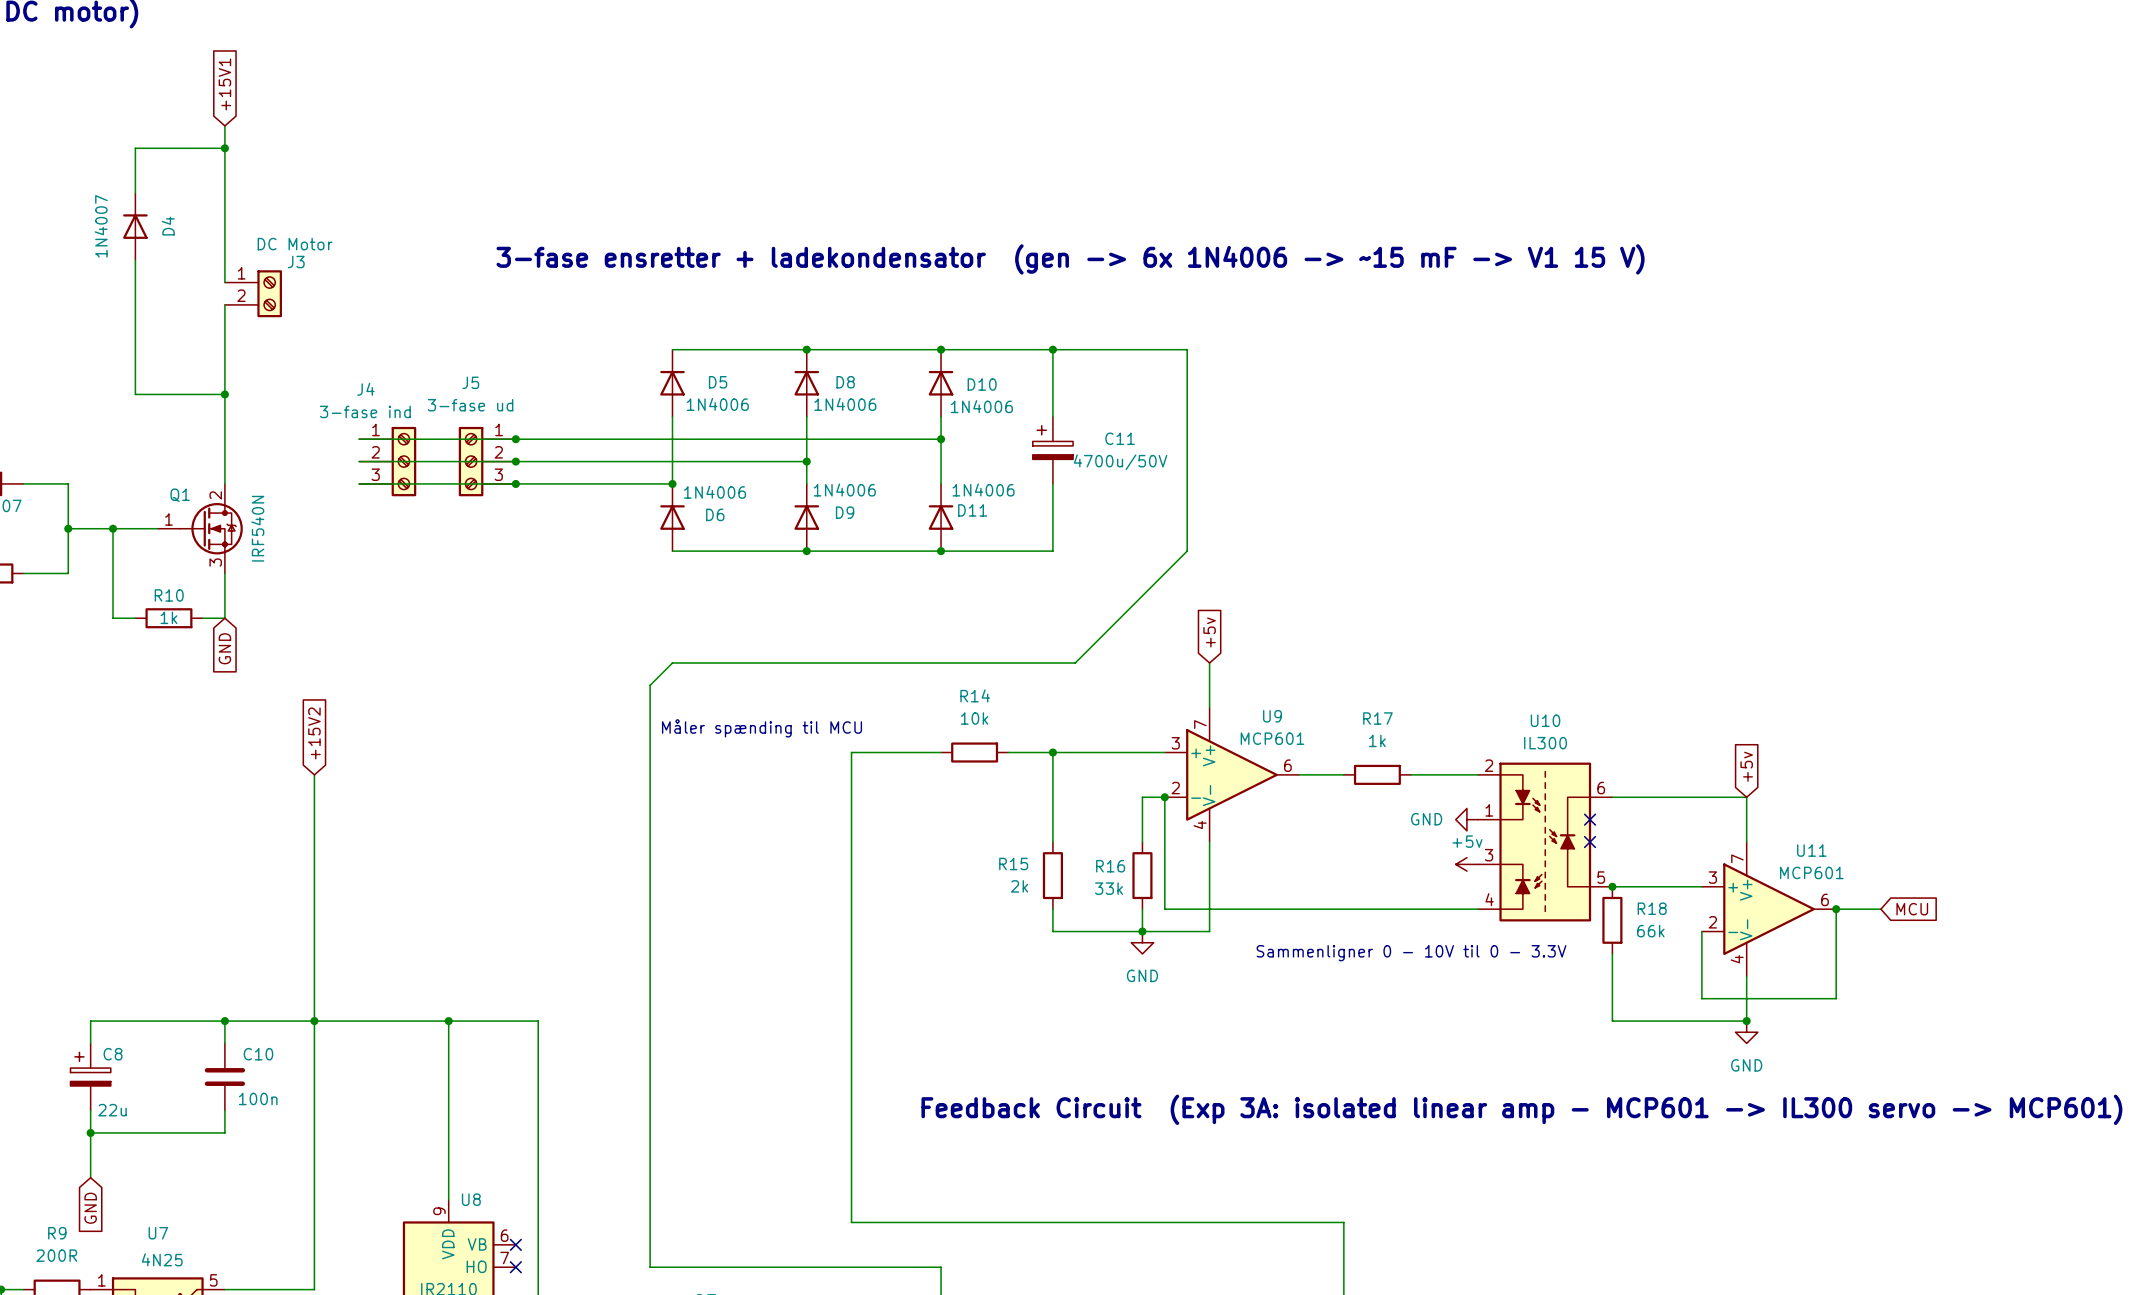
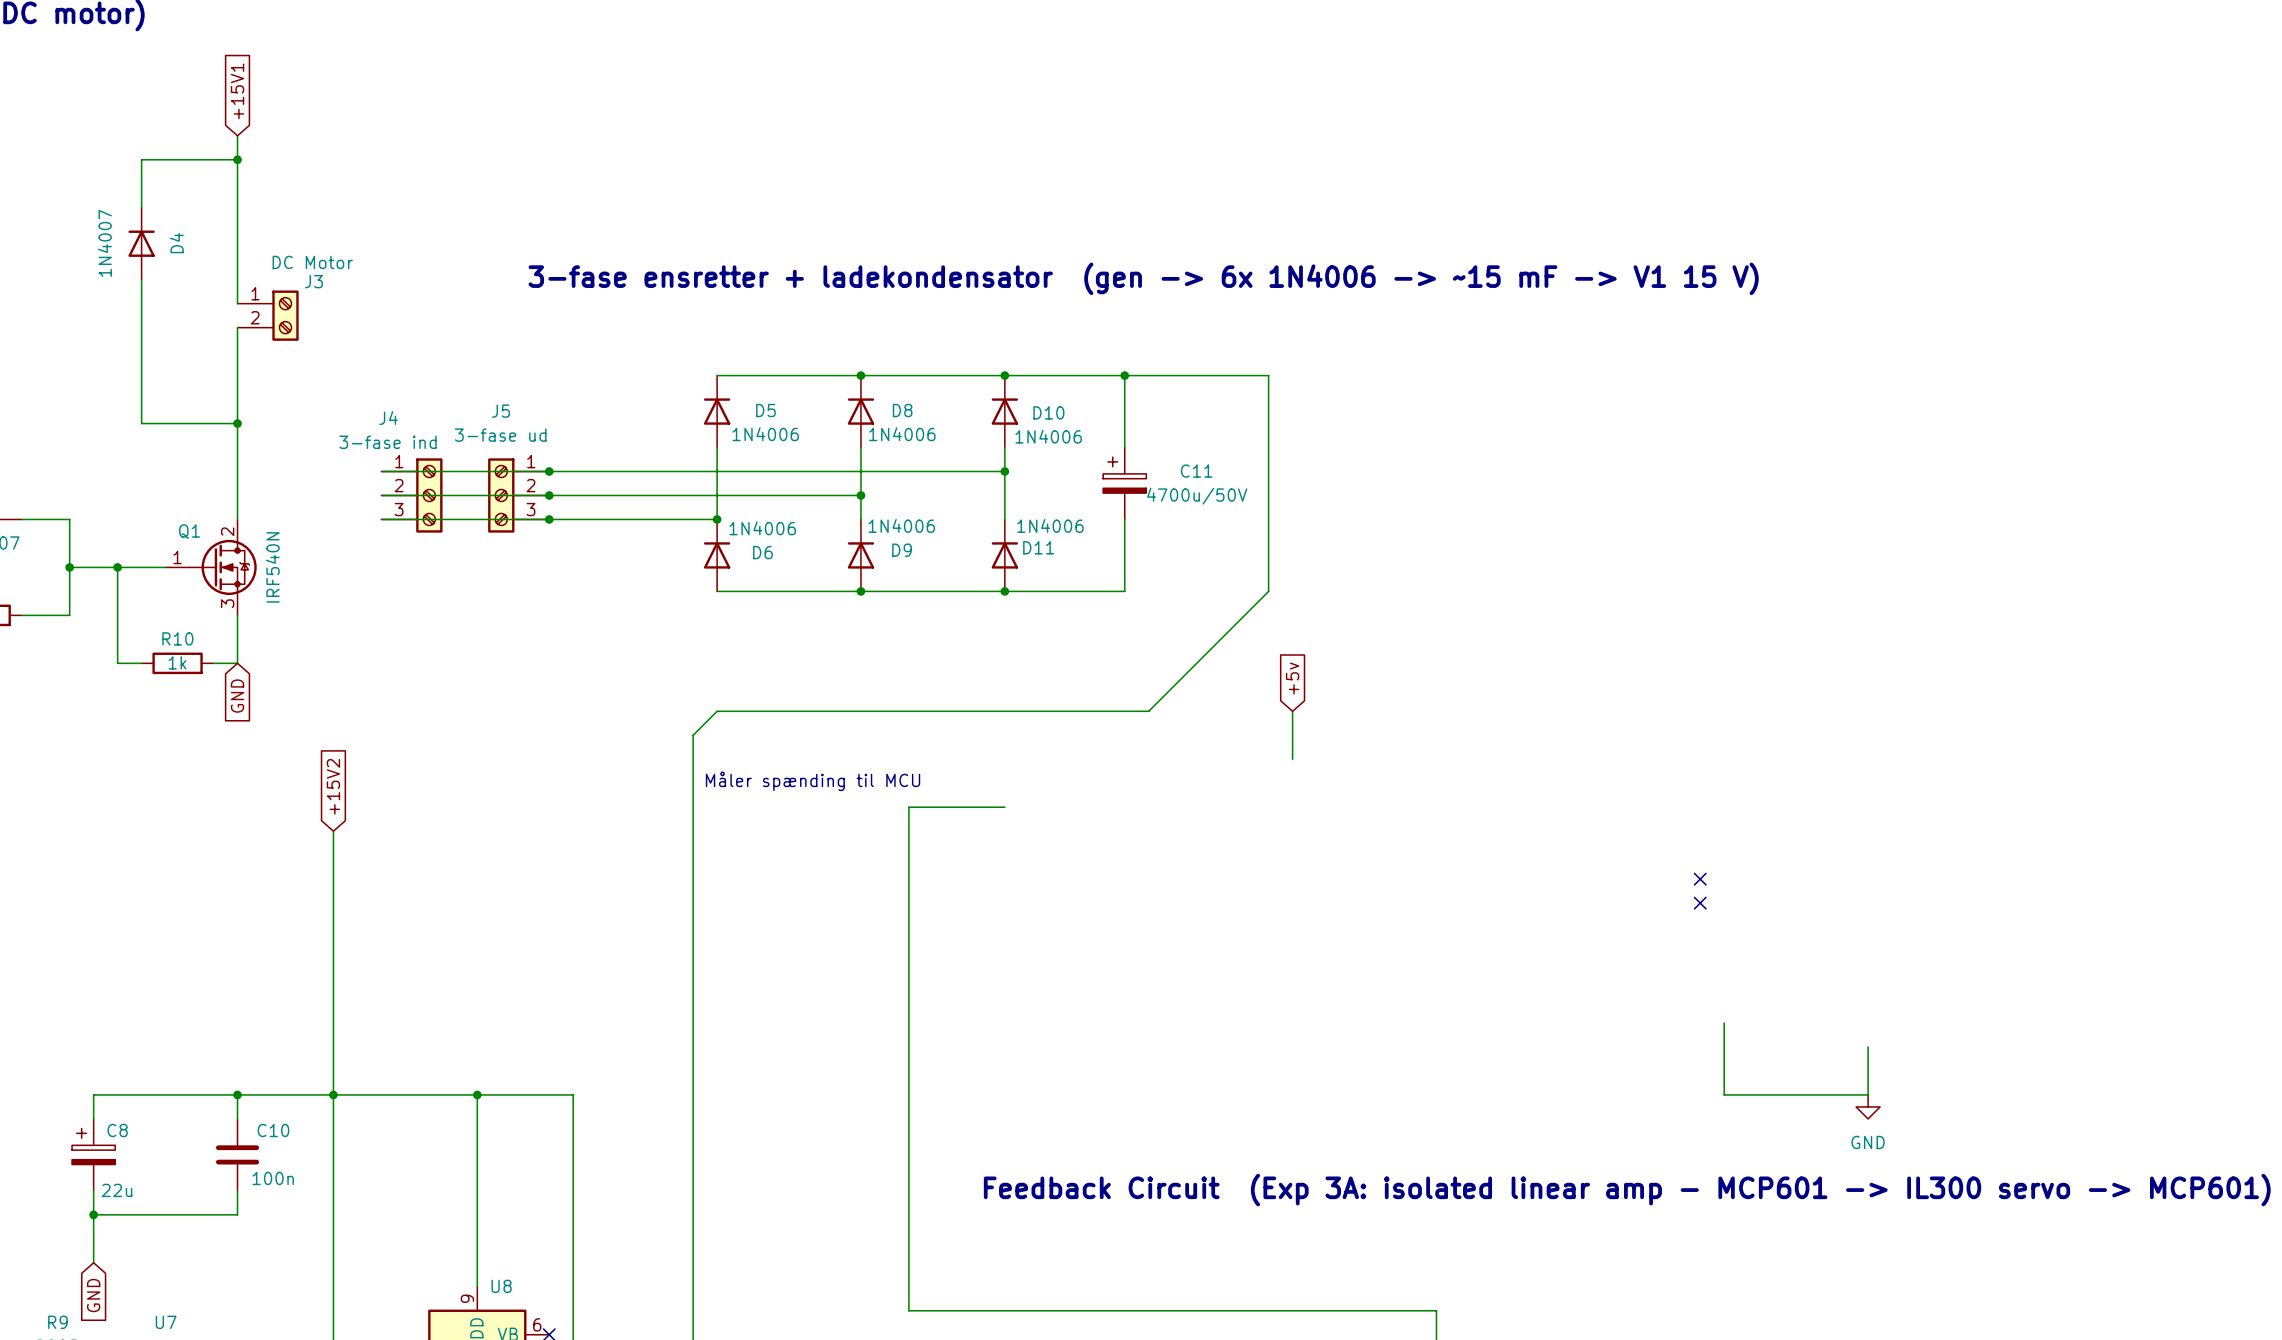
R14: 10k (974, 752) -> none
wire: (1008, 752) (1164, 752) -> none
wire: (1052, 752) (1052, 842) -> none
junction: (1052, 752) -> none
global label: +5v (1746, 766) -> none
U9: MCP601 (1231, 774) -> none
wire: (1299, 774) (1343, 774) -> none
R17: 1k (1377, 774) -> none
wire: (1410, 774) (1478, 774) -> none
junction: (1164, 797) -> none
wire: (1612, 797) (1746, 797) (1746, 842) -> none
power symbol: GND (1466, 819) -> none
wire: (1142, 842) (1142, 797) (1164, 797) (1164, 909) (1478, 909) -> none
wire: (1209, 842) (1209, 931) (1052, 931) (1052, 909) -> none
U10: IL300 (1545, 842) -> none
power symbol: +5v (1466, 864) -> none
R15: 2k (1052, 875) -> none
R16: 33k (1142, 875) -> none
wire: (1612, 886) (1701, 886) -> none
junction: (1612, 886) -> none
wire: (1142, 909) (1142, 931) -> none
U11: MCP601 (1769, 909) -> none
junction: (1836, 909) -> none
wire: (1880, 909) (1836, 909) (1836, 998) (1701, 998) (1701, 931) -> none
global label: MCU (1912, 909) -> none
R18: 66k (1612, 920) -> none
junction: (1142, 931) -> none
power symbol: GND (1142, 942) -> none
text: Sammenligner 0 - 10V til 0 - 3.3V (1411, 953) -> none
junction: (1746, 1021) -> none

